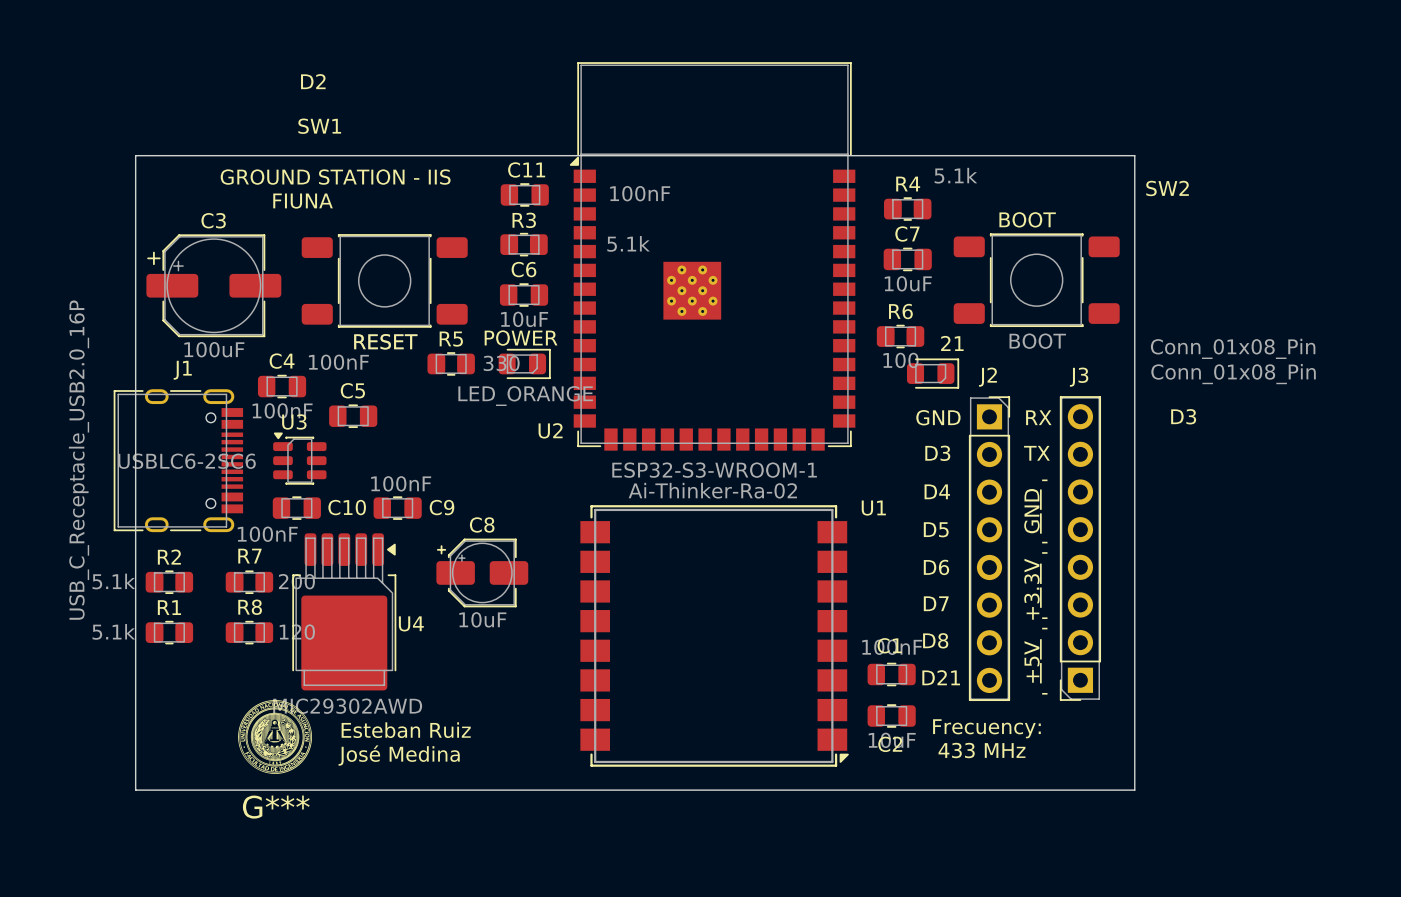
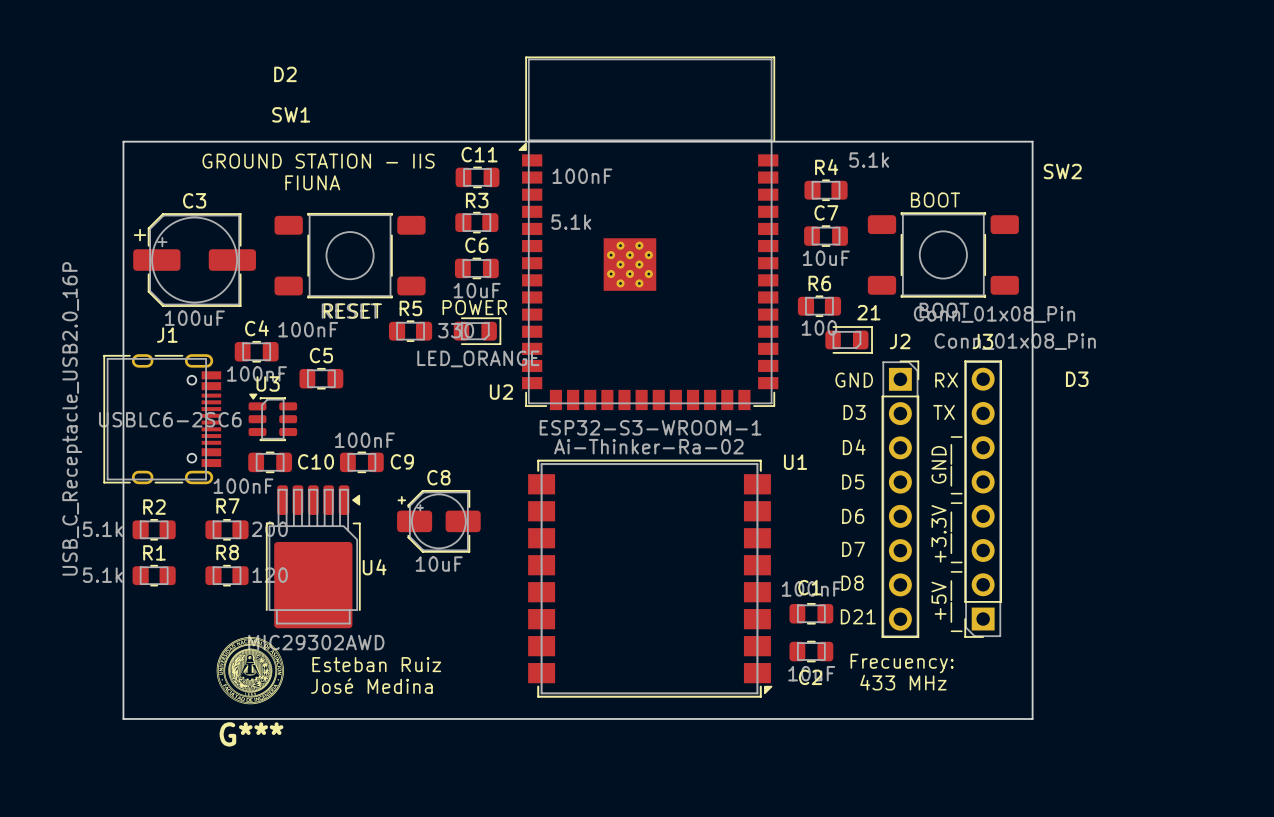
J2 value position: Conn_01x08_Pin (1233, 348) -> Conn_01x08_Pin (994, 314)
J3 value position: Conn_01x08_Pin (1233, 374) -> Conn_01x08_Pin (1015, 341)

